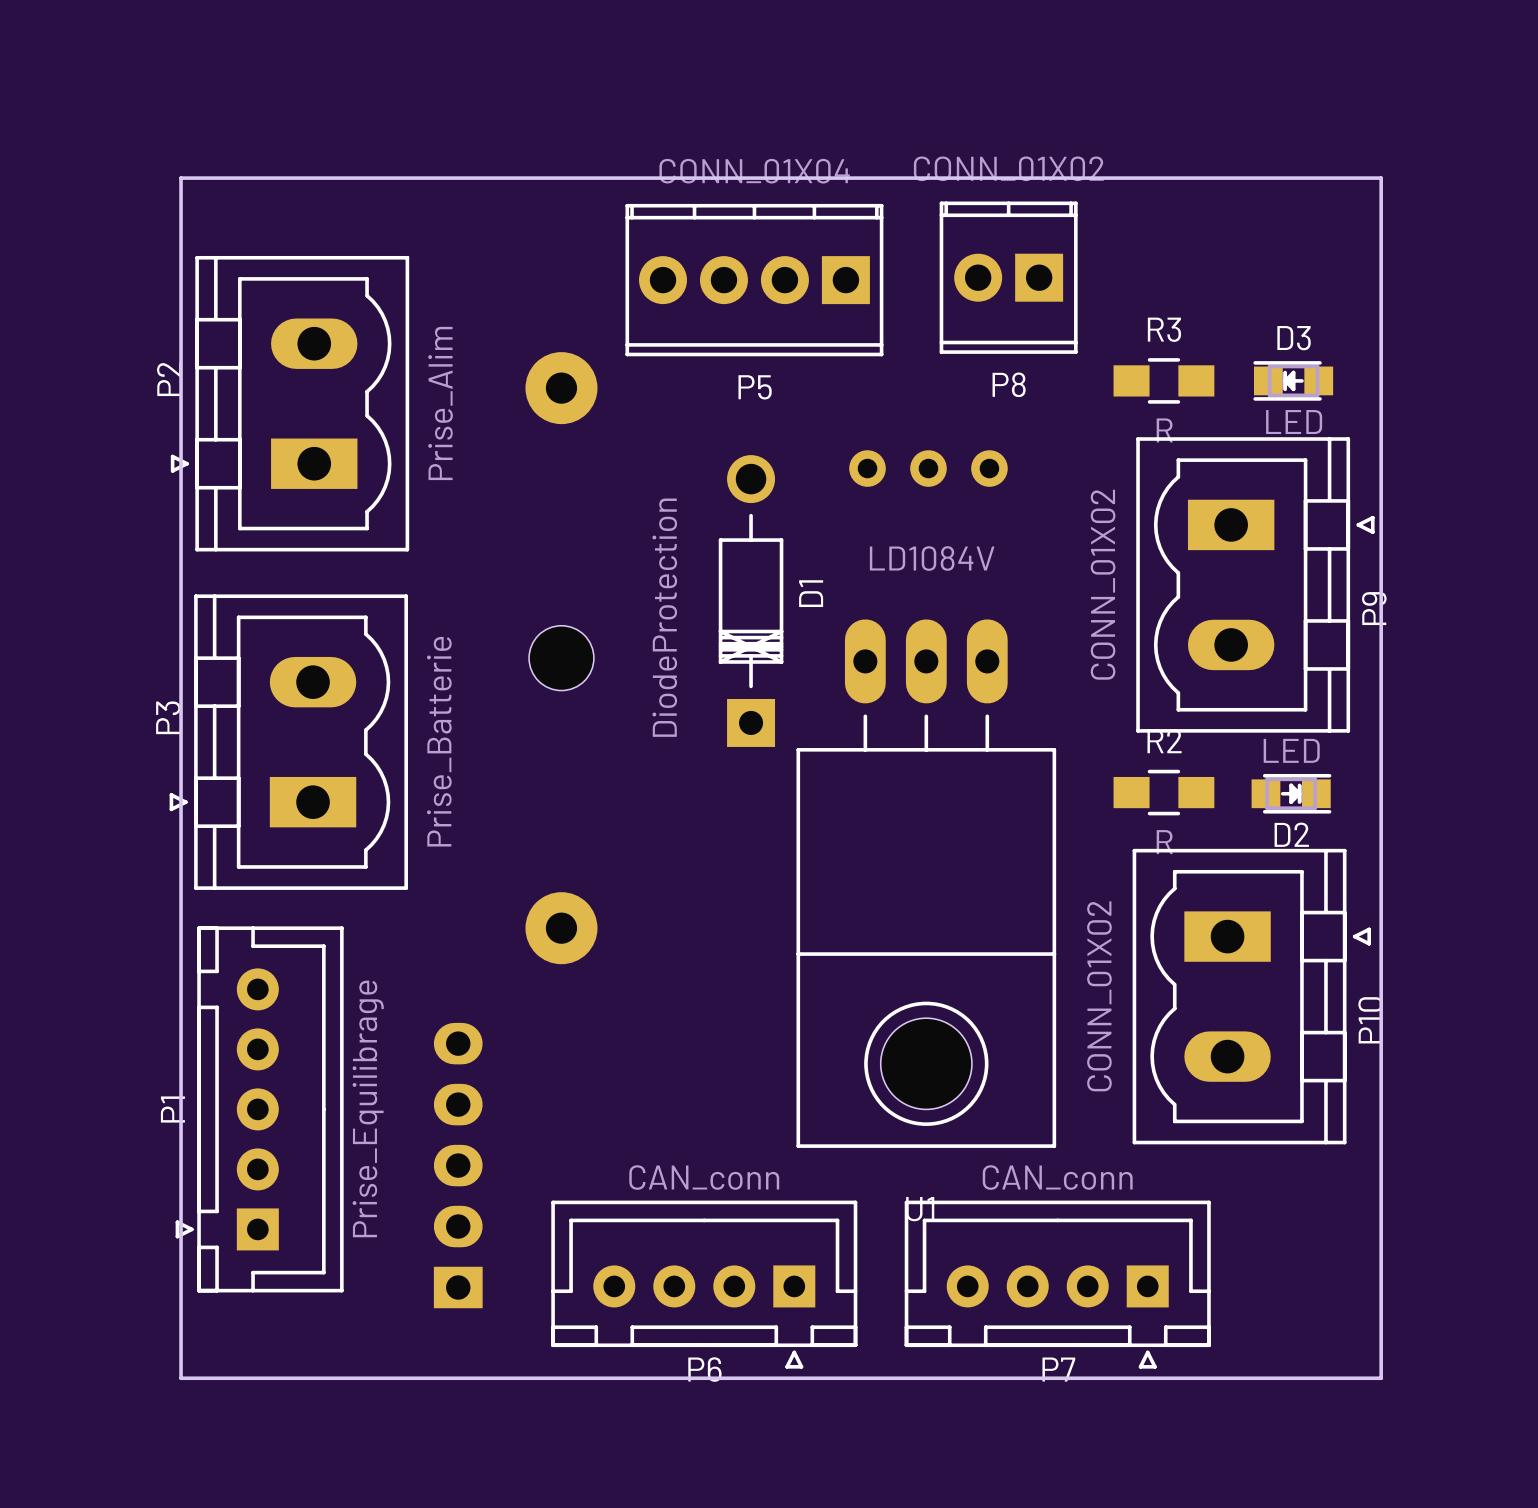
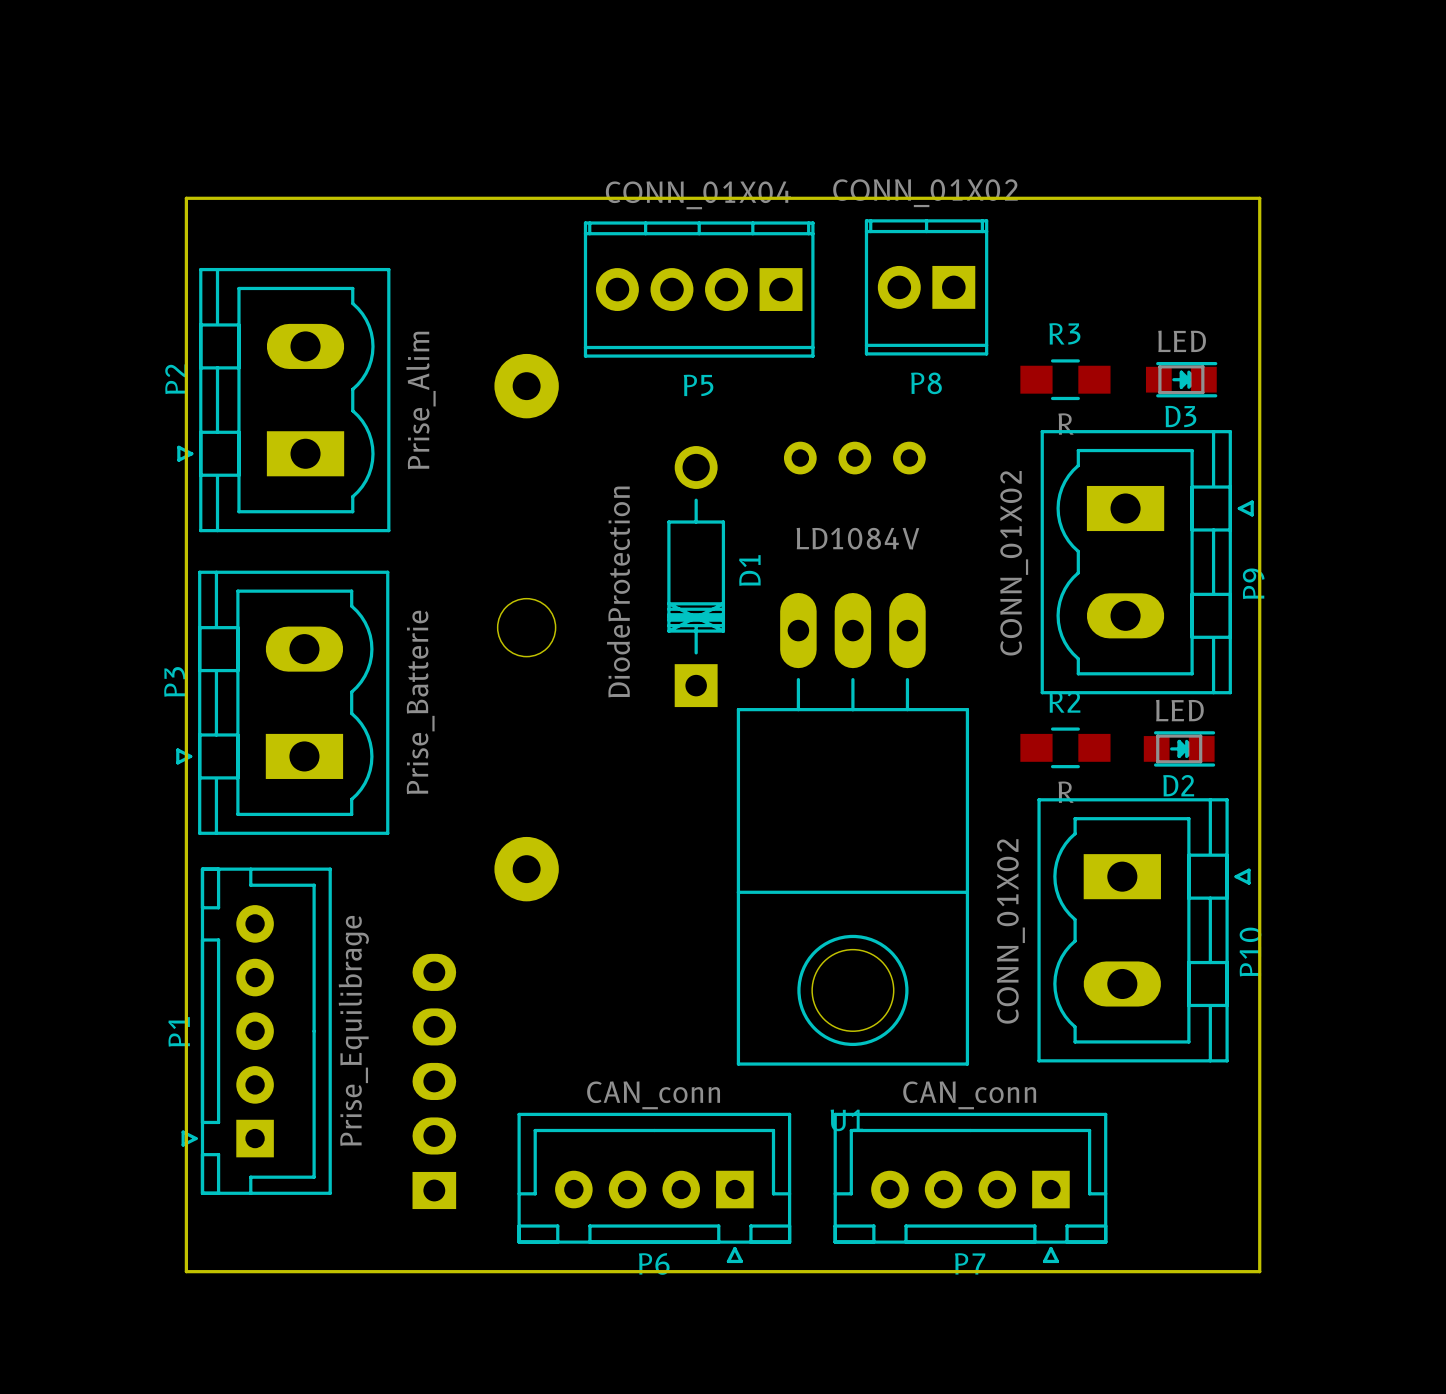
D3 rotation: 0° (1293, 380) -> 180° (1181, 379)

